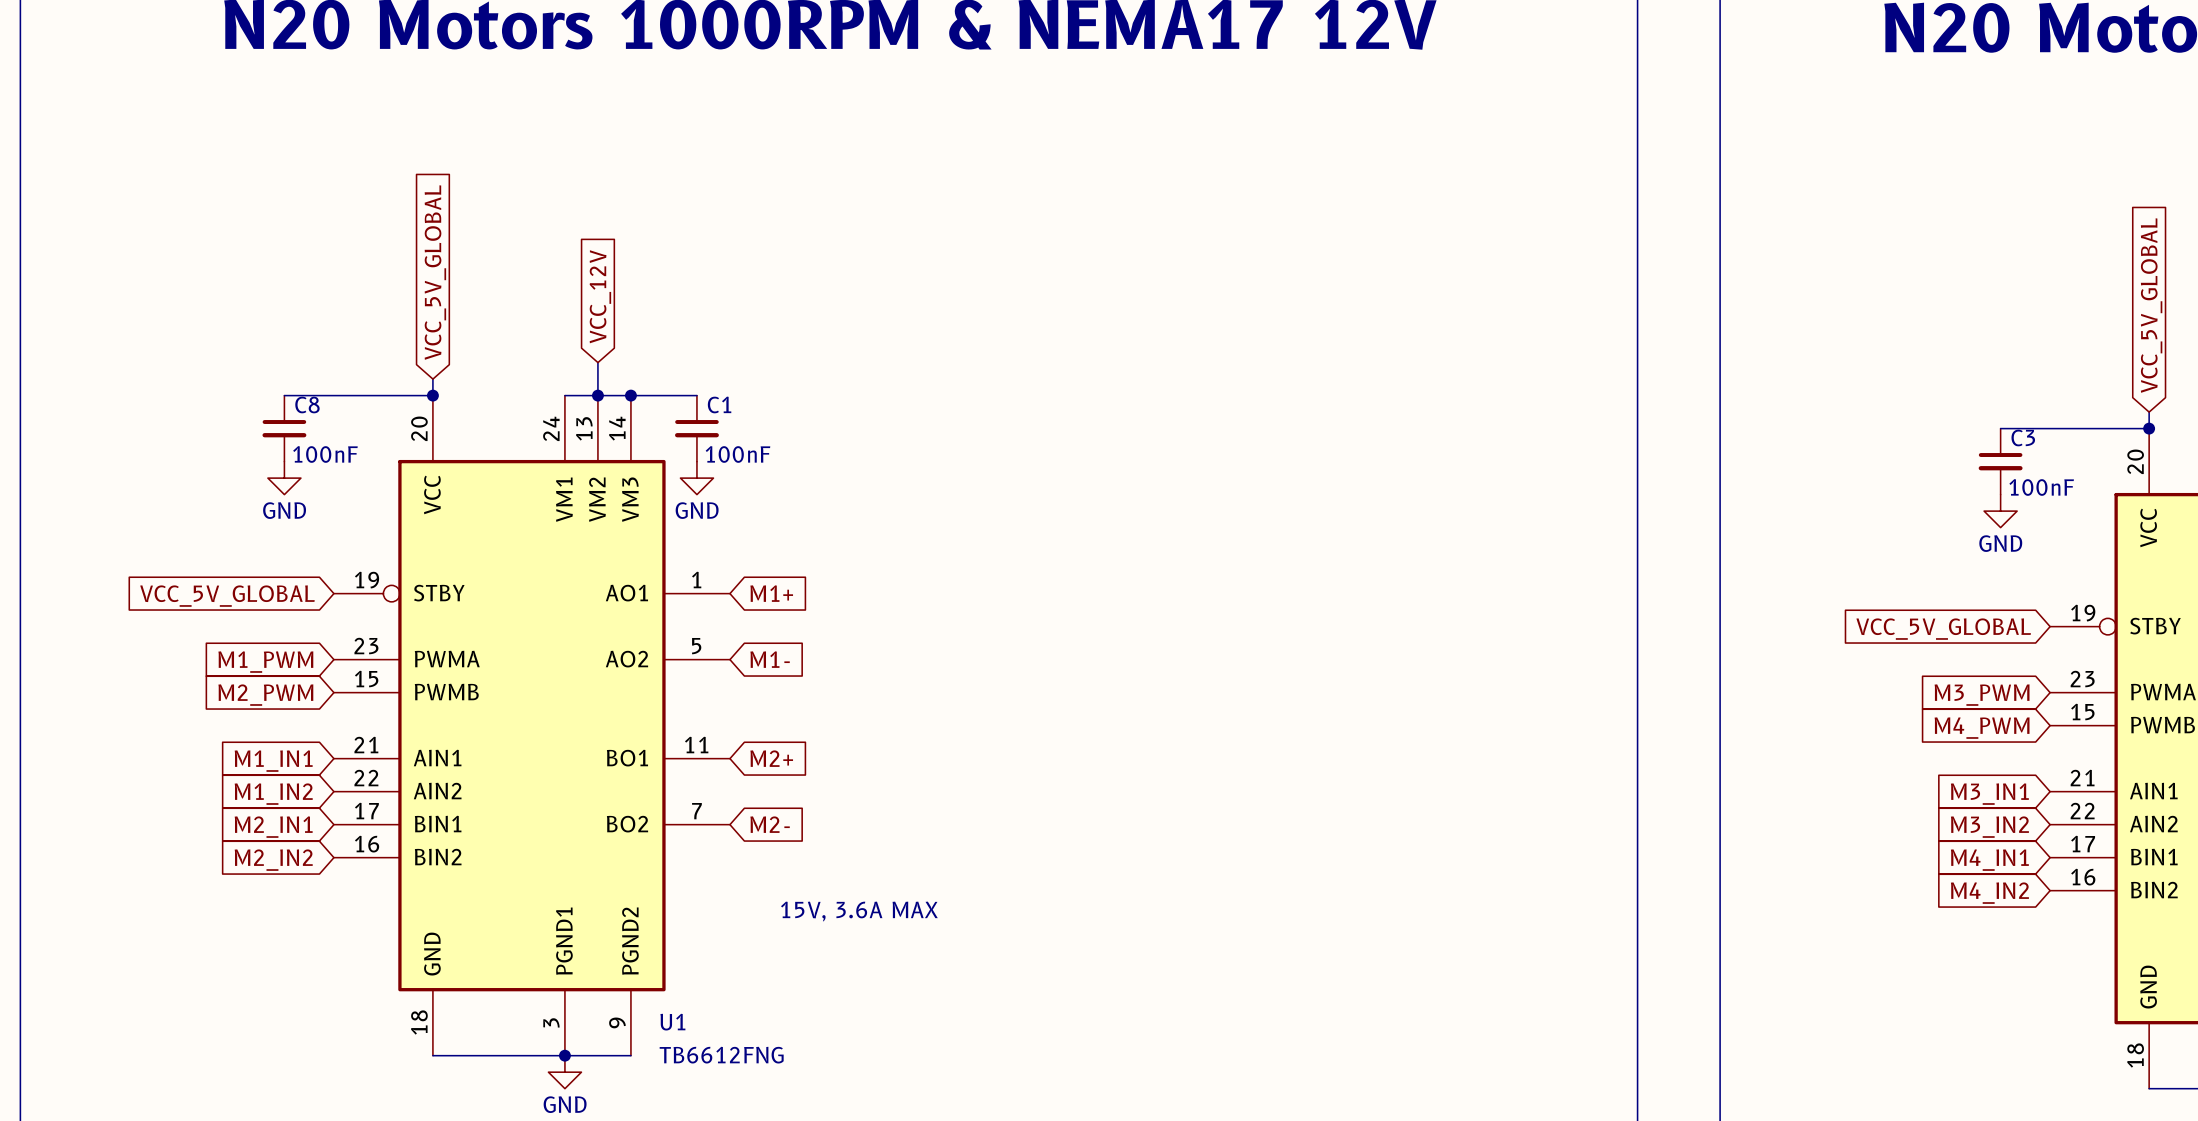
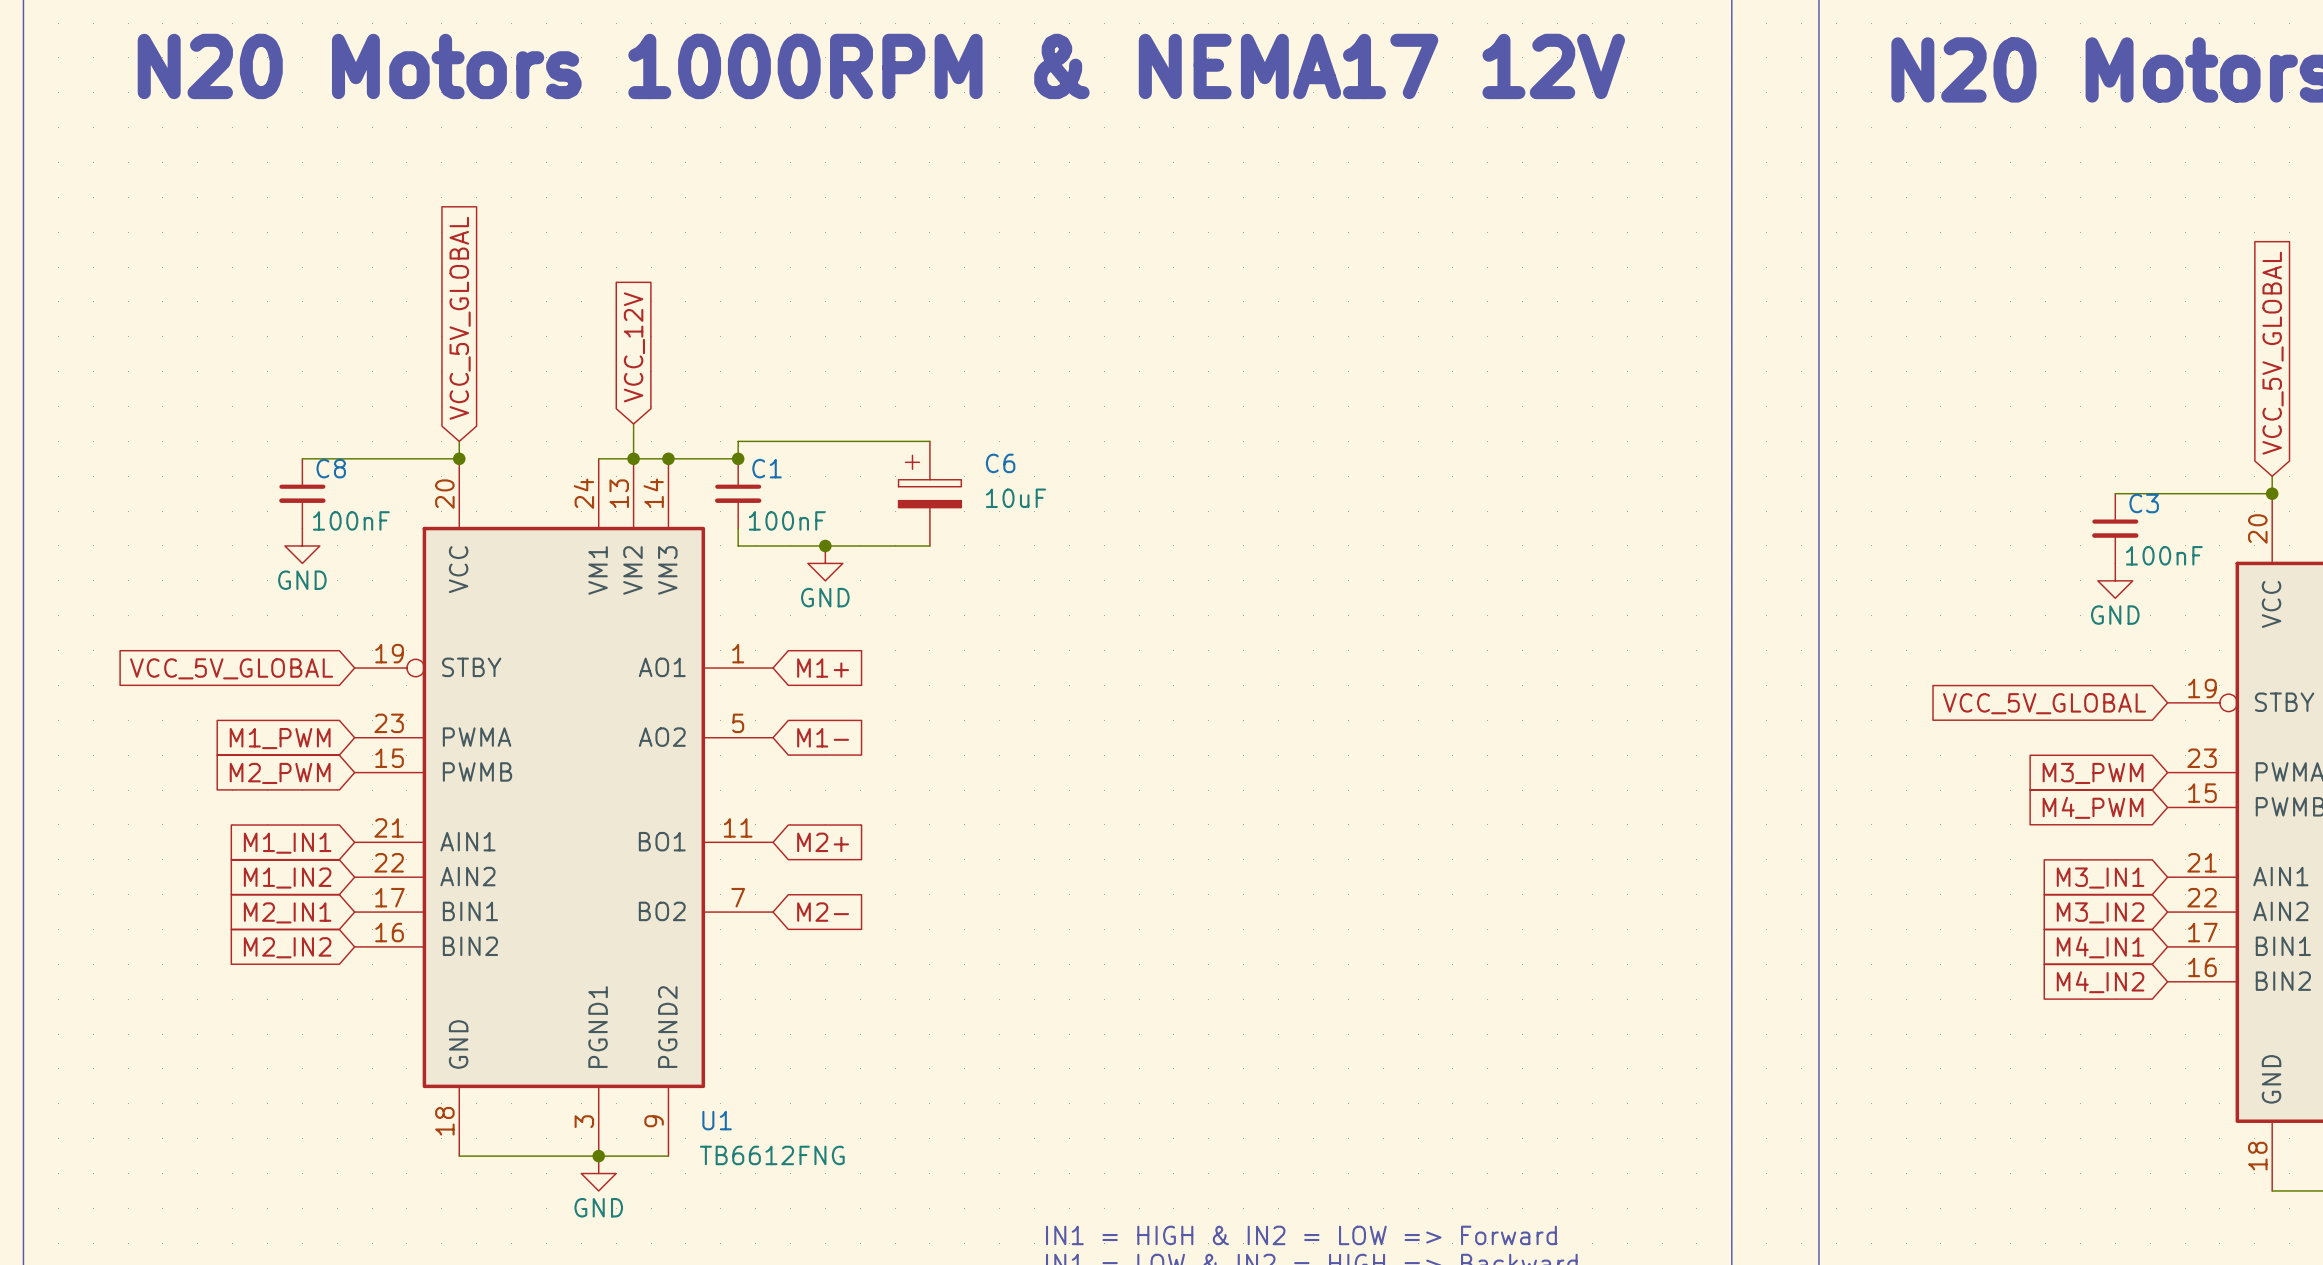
wire: none -> (929, 441) (738, 441) (738, 458)
junction: none -> (738, 458)
C6: none -> 10uF (929, 493)
wire: none -> (738, 528) (738, 545) (929, 545)
power symbol position: GND (696, 478) -> GND (825, 563)
junction: none -> (825, 545)
text: 15V, 3.6A MAX (859, 911) -> none

